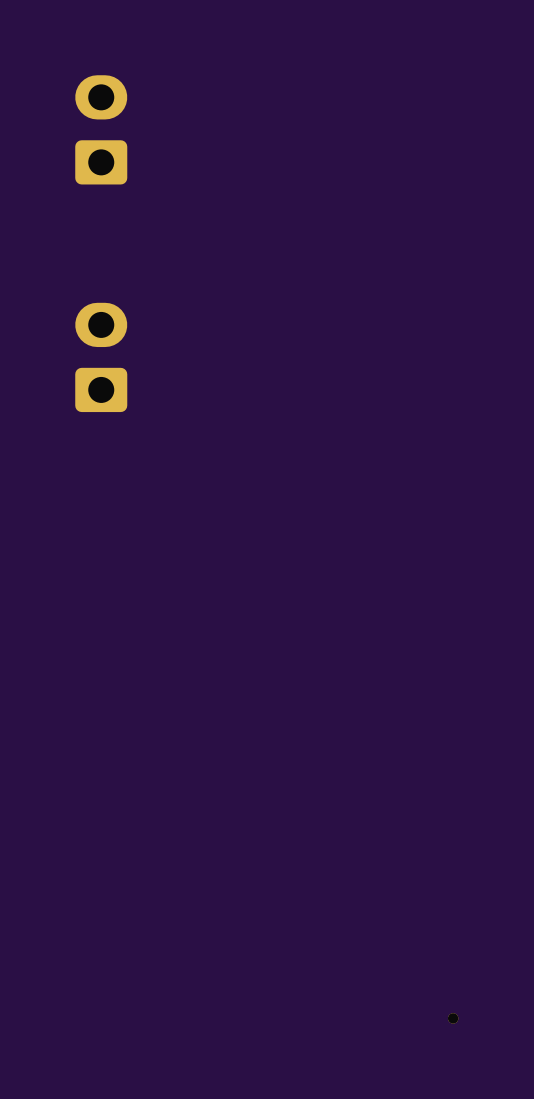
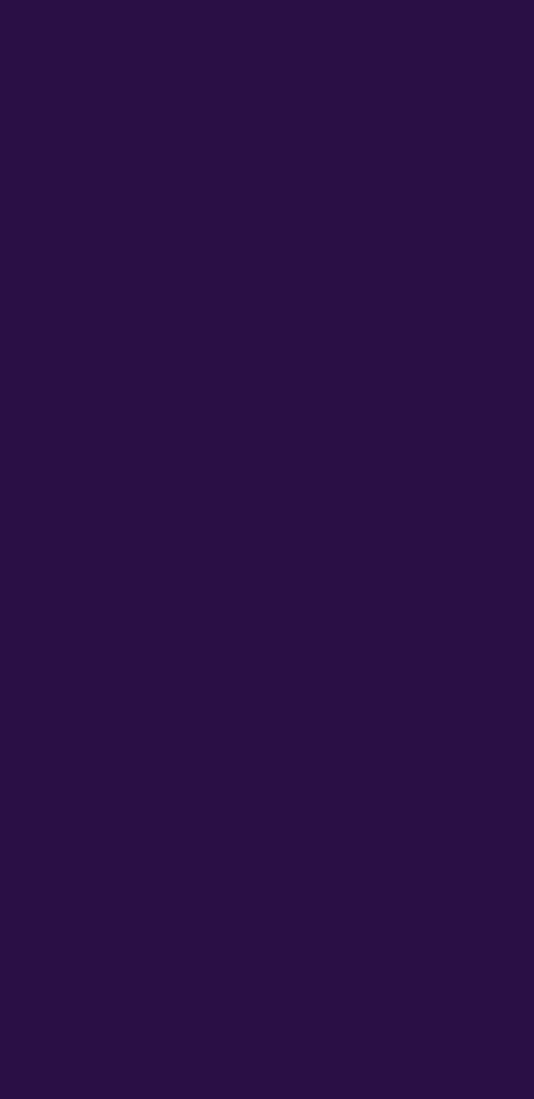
part: (101, 129) -> none
part: (101, 357) -> none
part: (453, 1018) -> none

